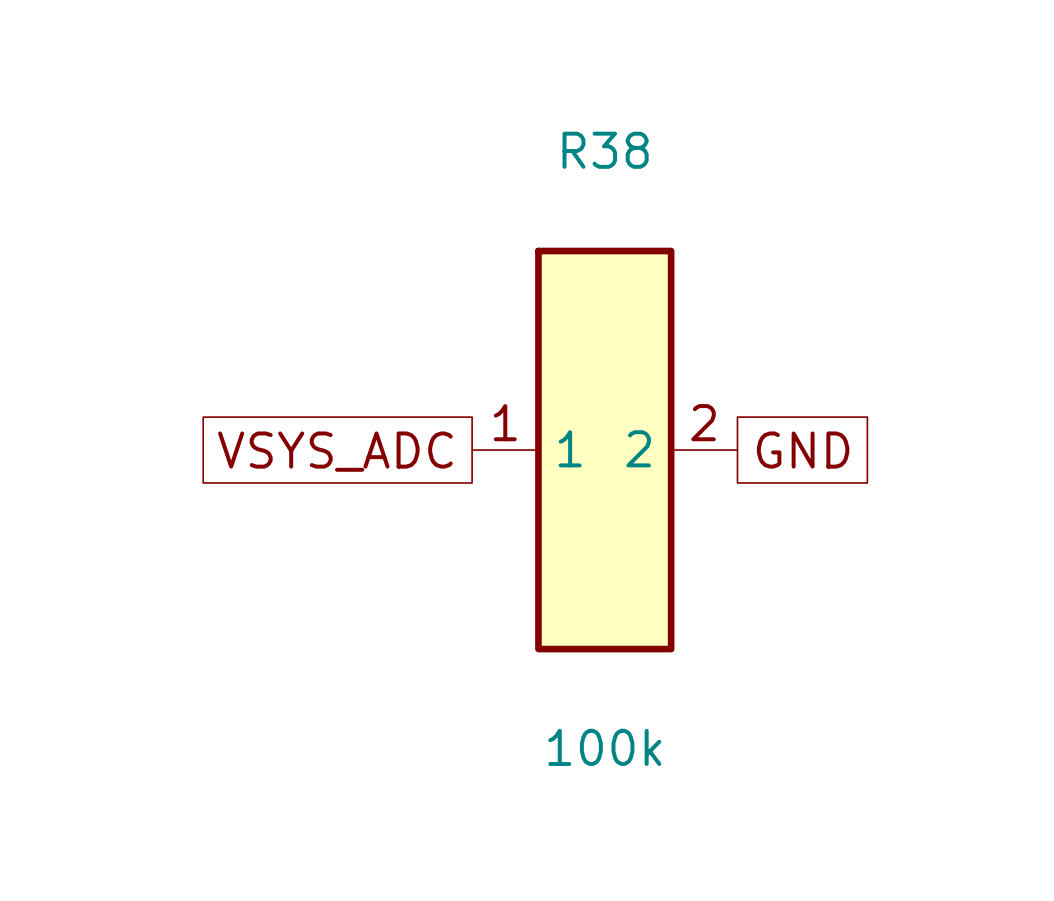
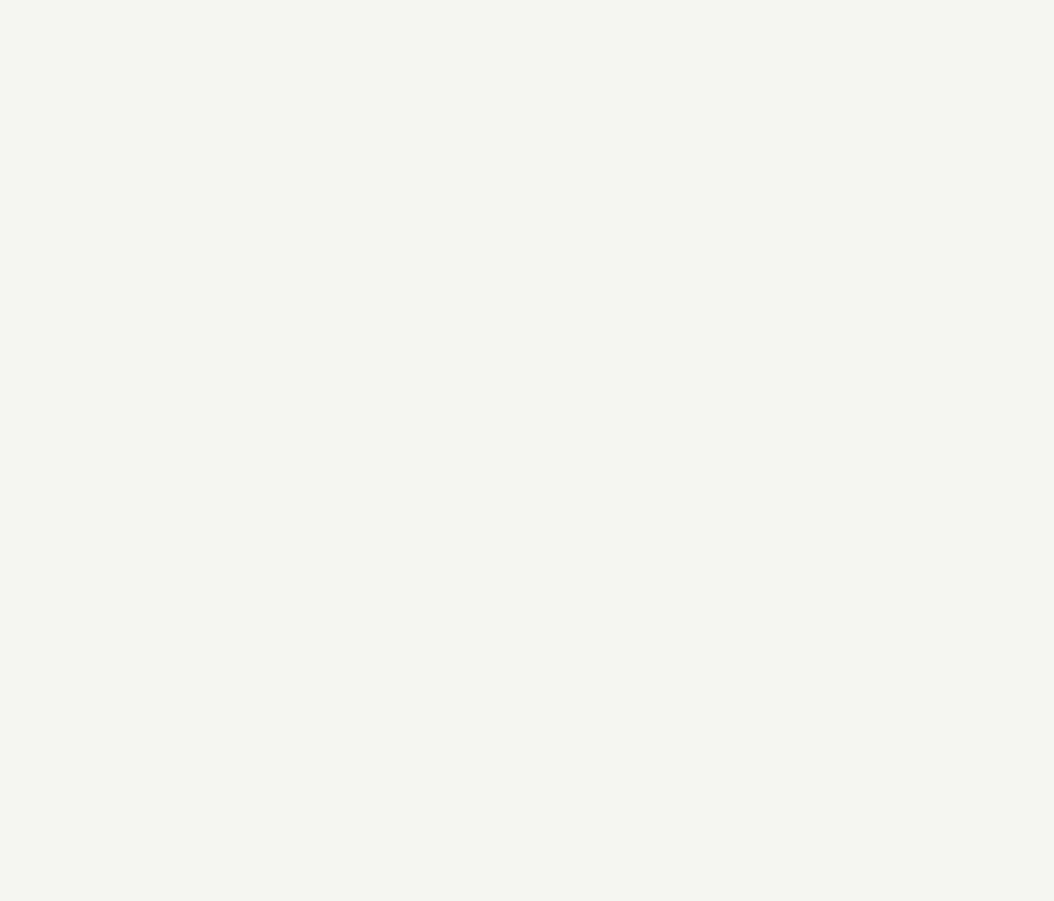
R38: 100k (604, 450) -> none
global label: GND (803, 450) -> none
global label: VSYS_ADC (335, 451) -> none

